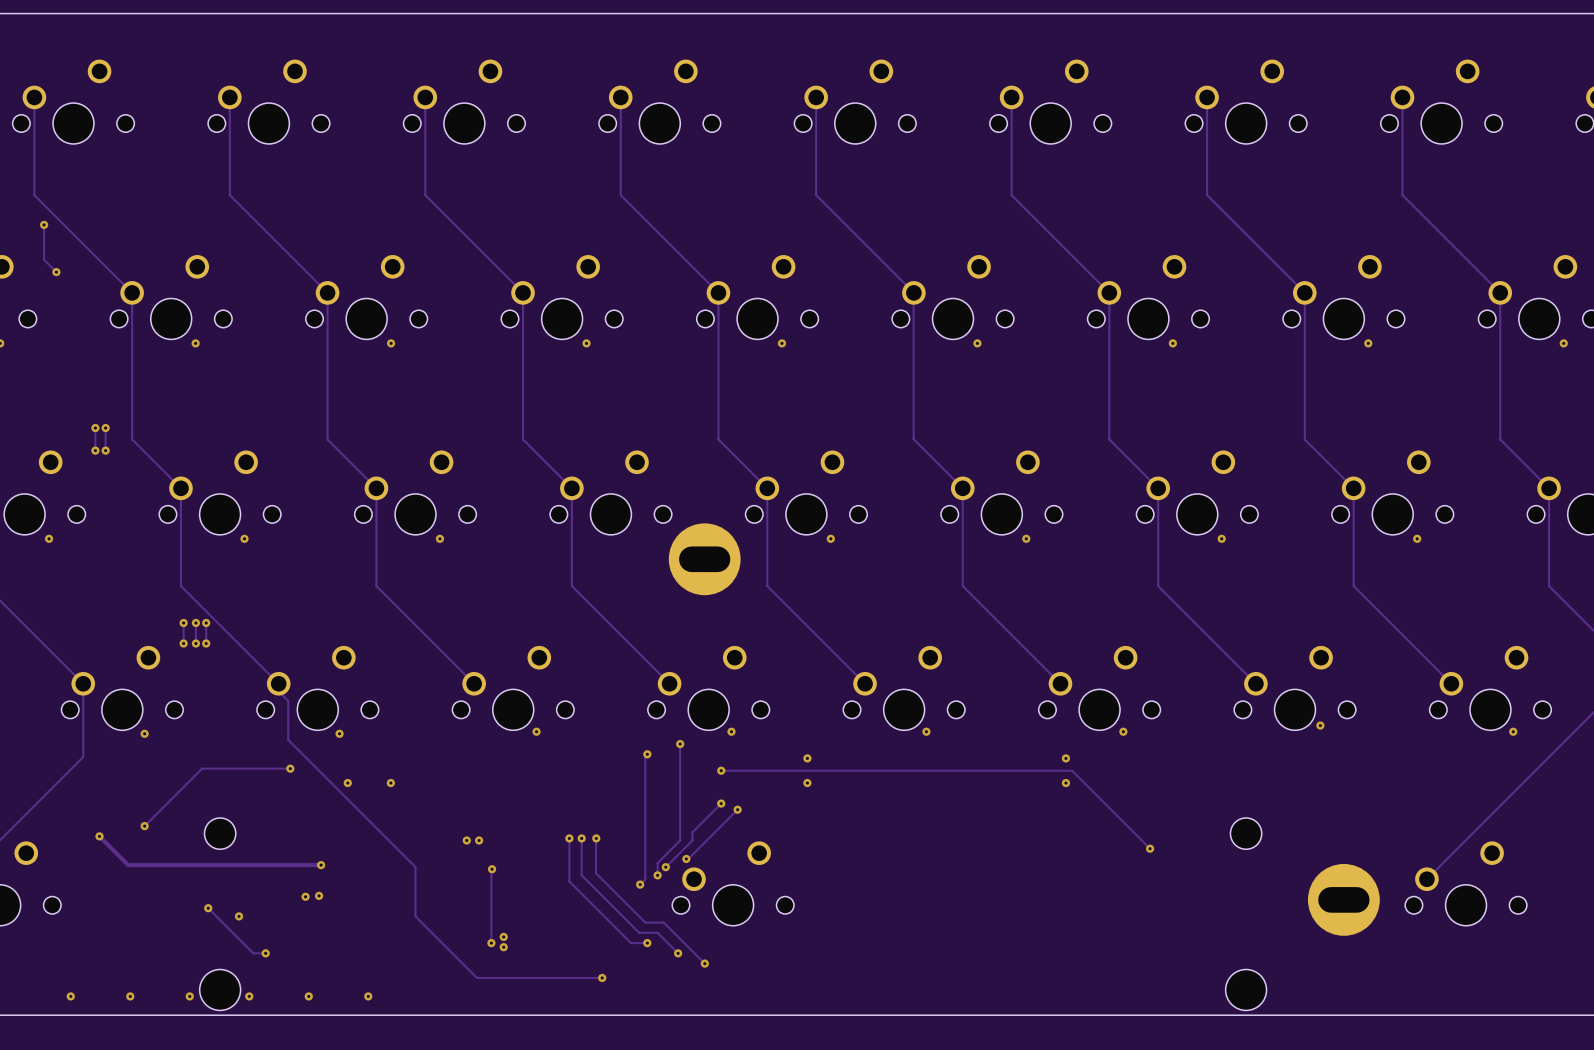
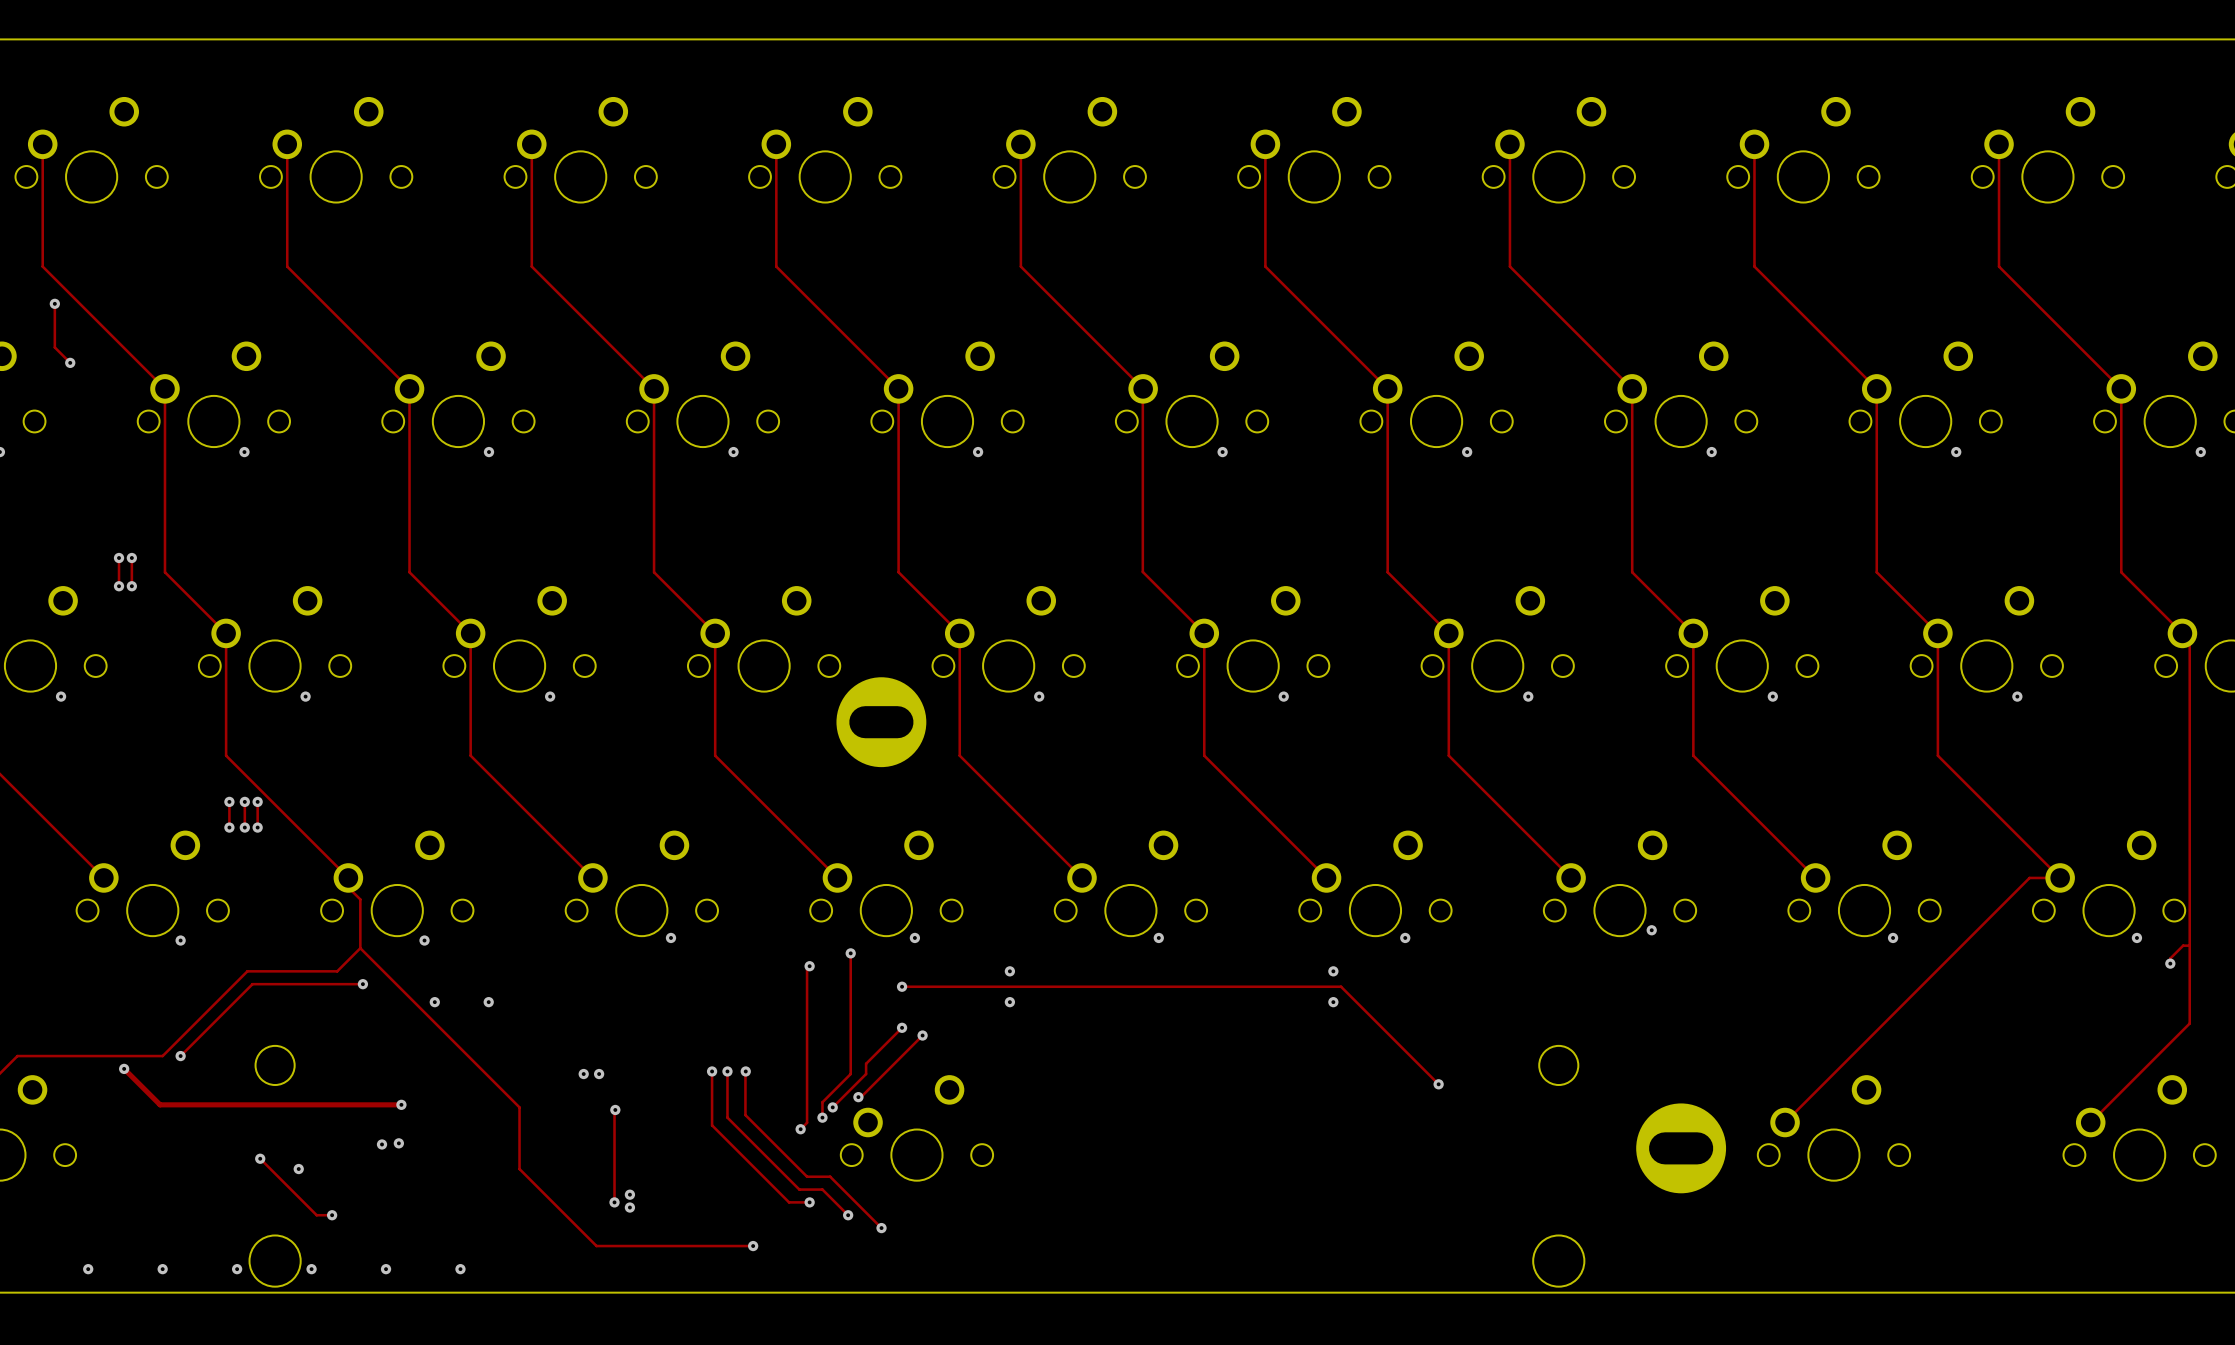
track: (83, 683) (83, 757) (14, 826) -> (360, 948) (337, 971) (247, 971) (162, 1056) (17, 1056)

